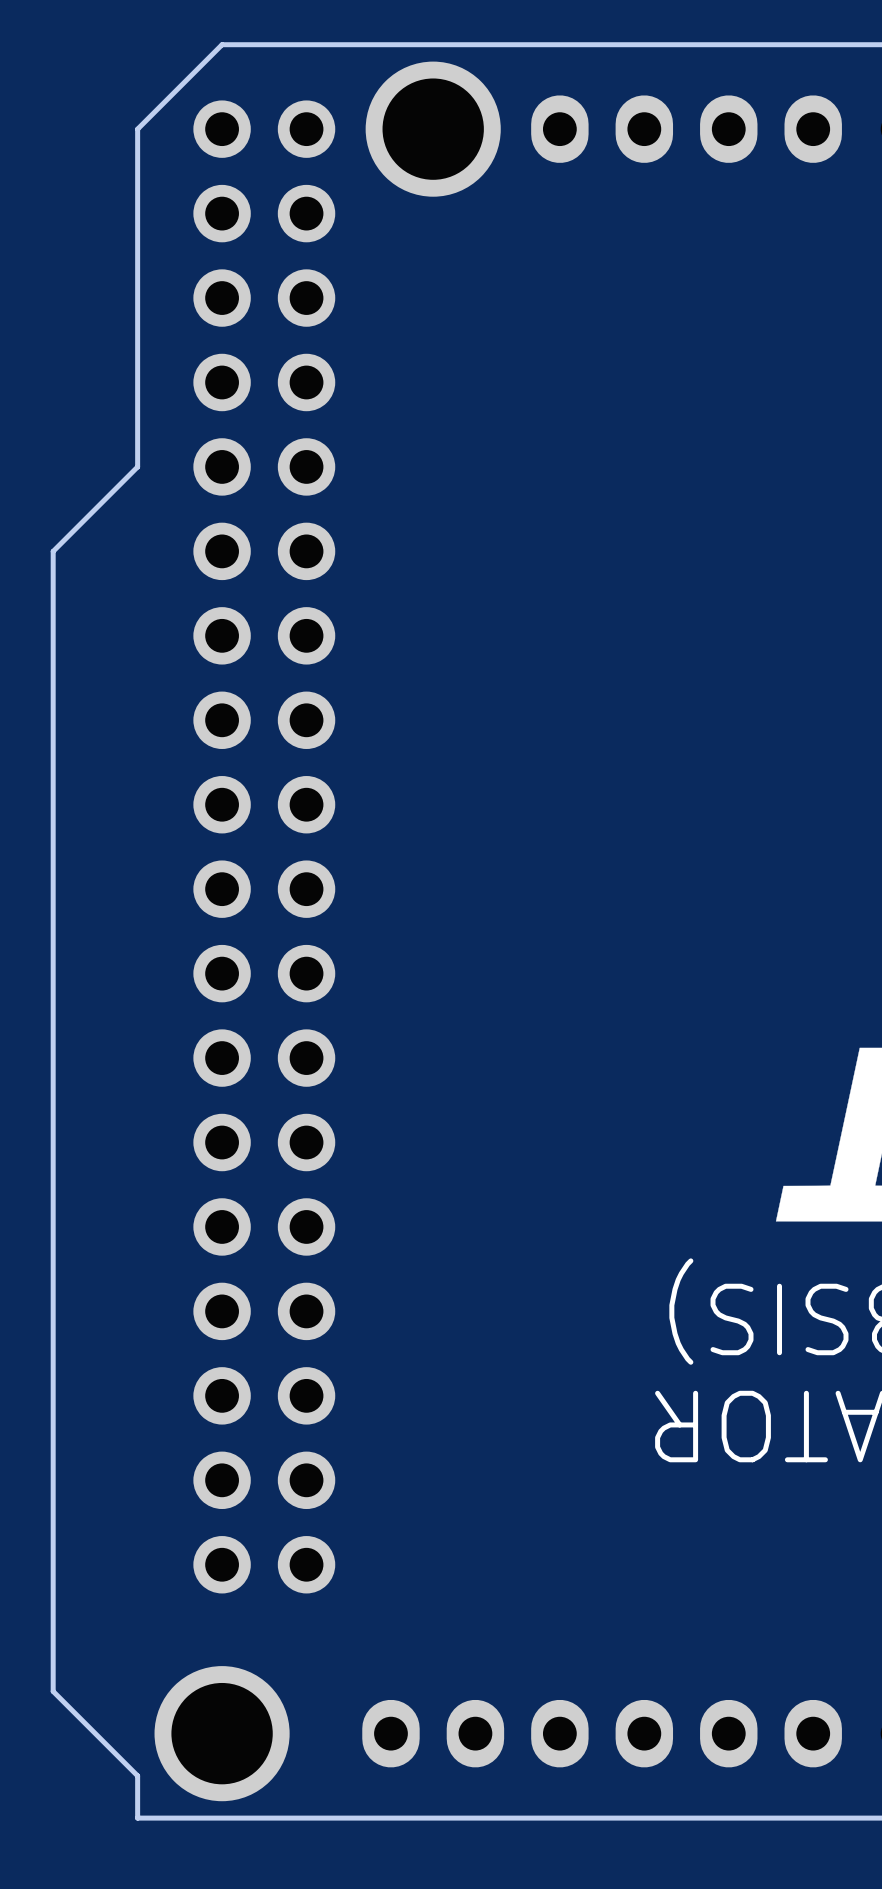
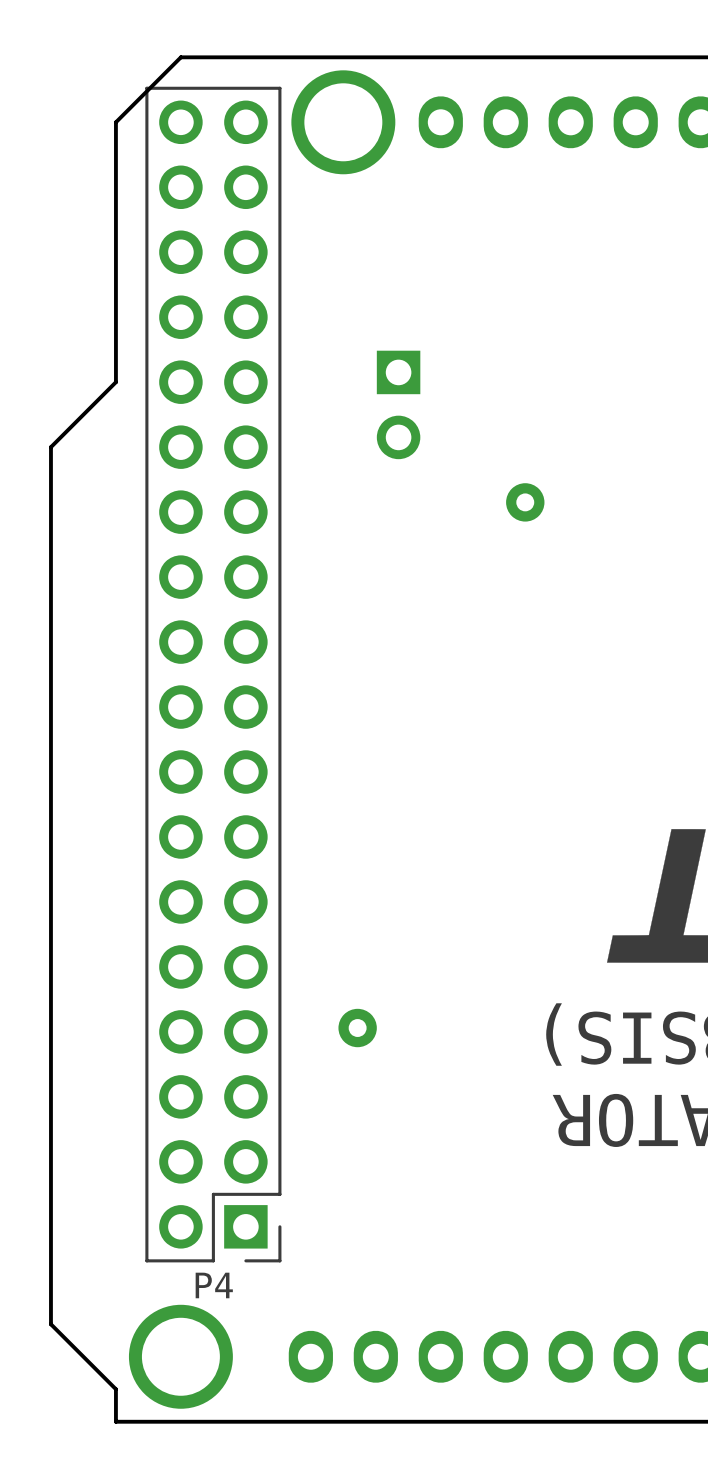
part: none -> (398, 404)
part: none -> (525, 502)
part: (264, 846) -> none
P4: none -> (213, 674)
part: none -> (357, 1028)

